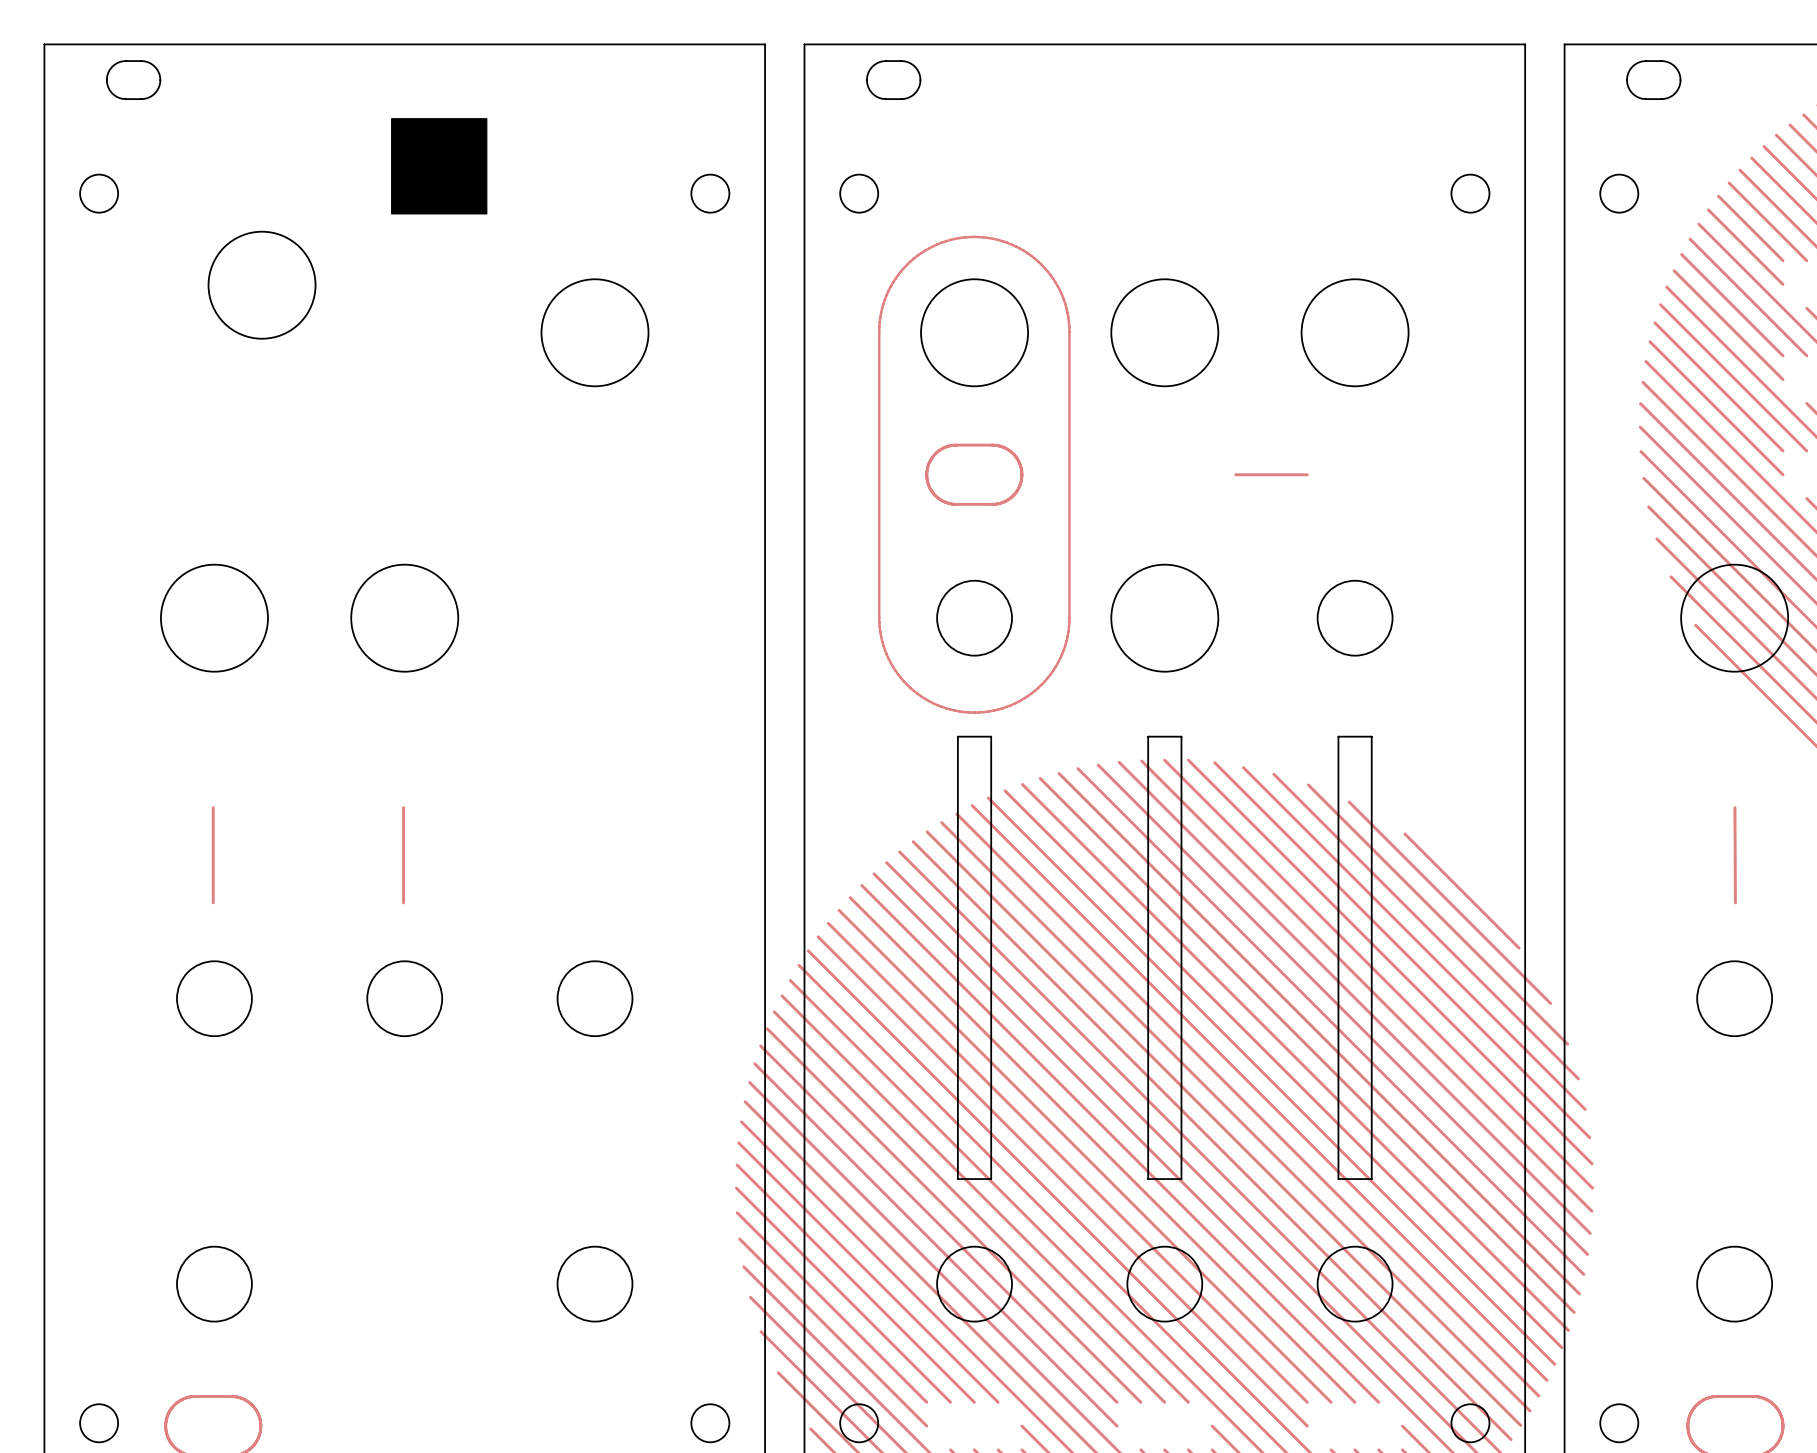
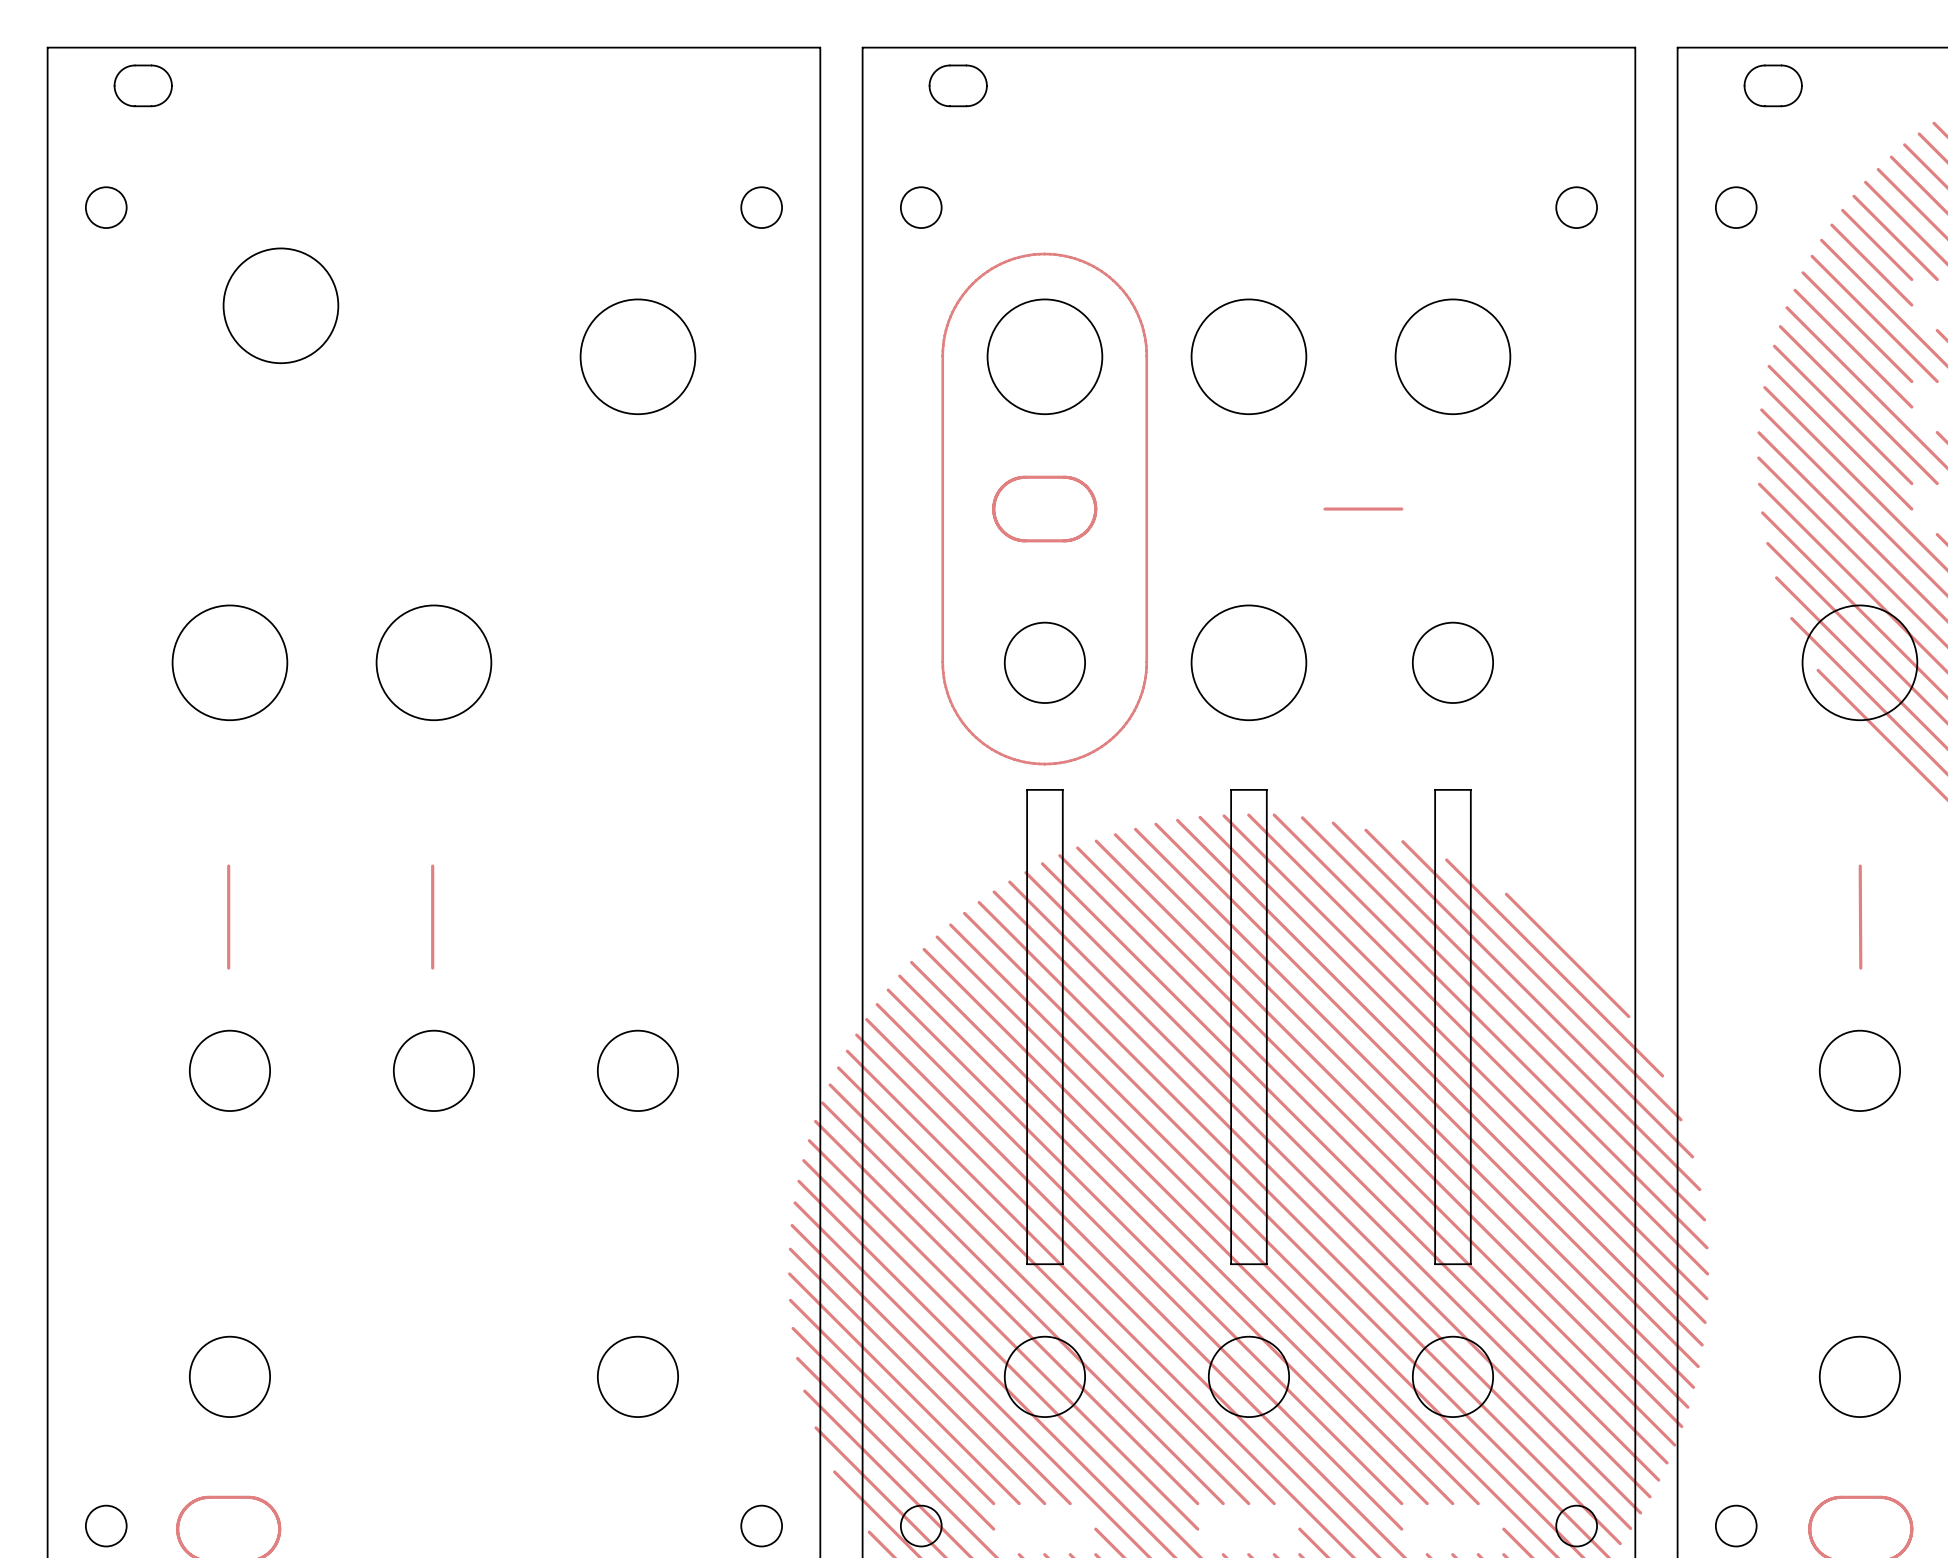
drawing: [391, 118, 488, 215] -> none

